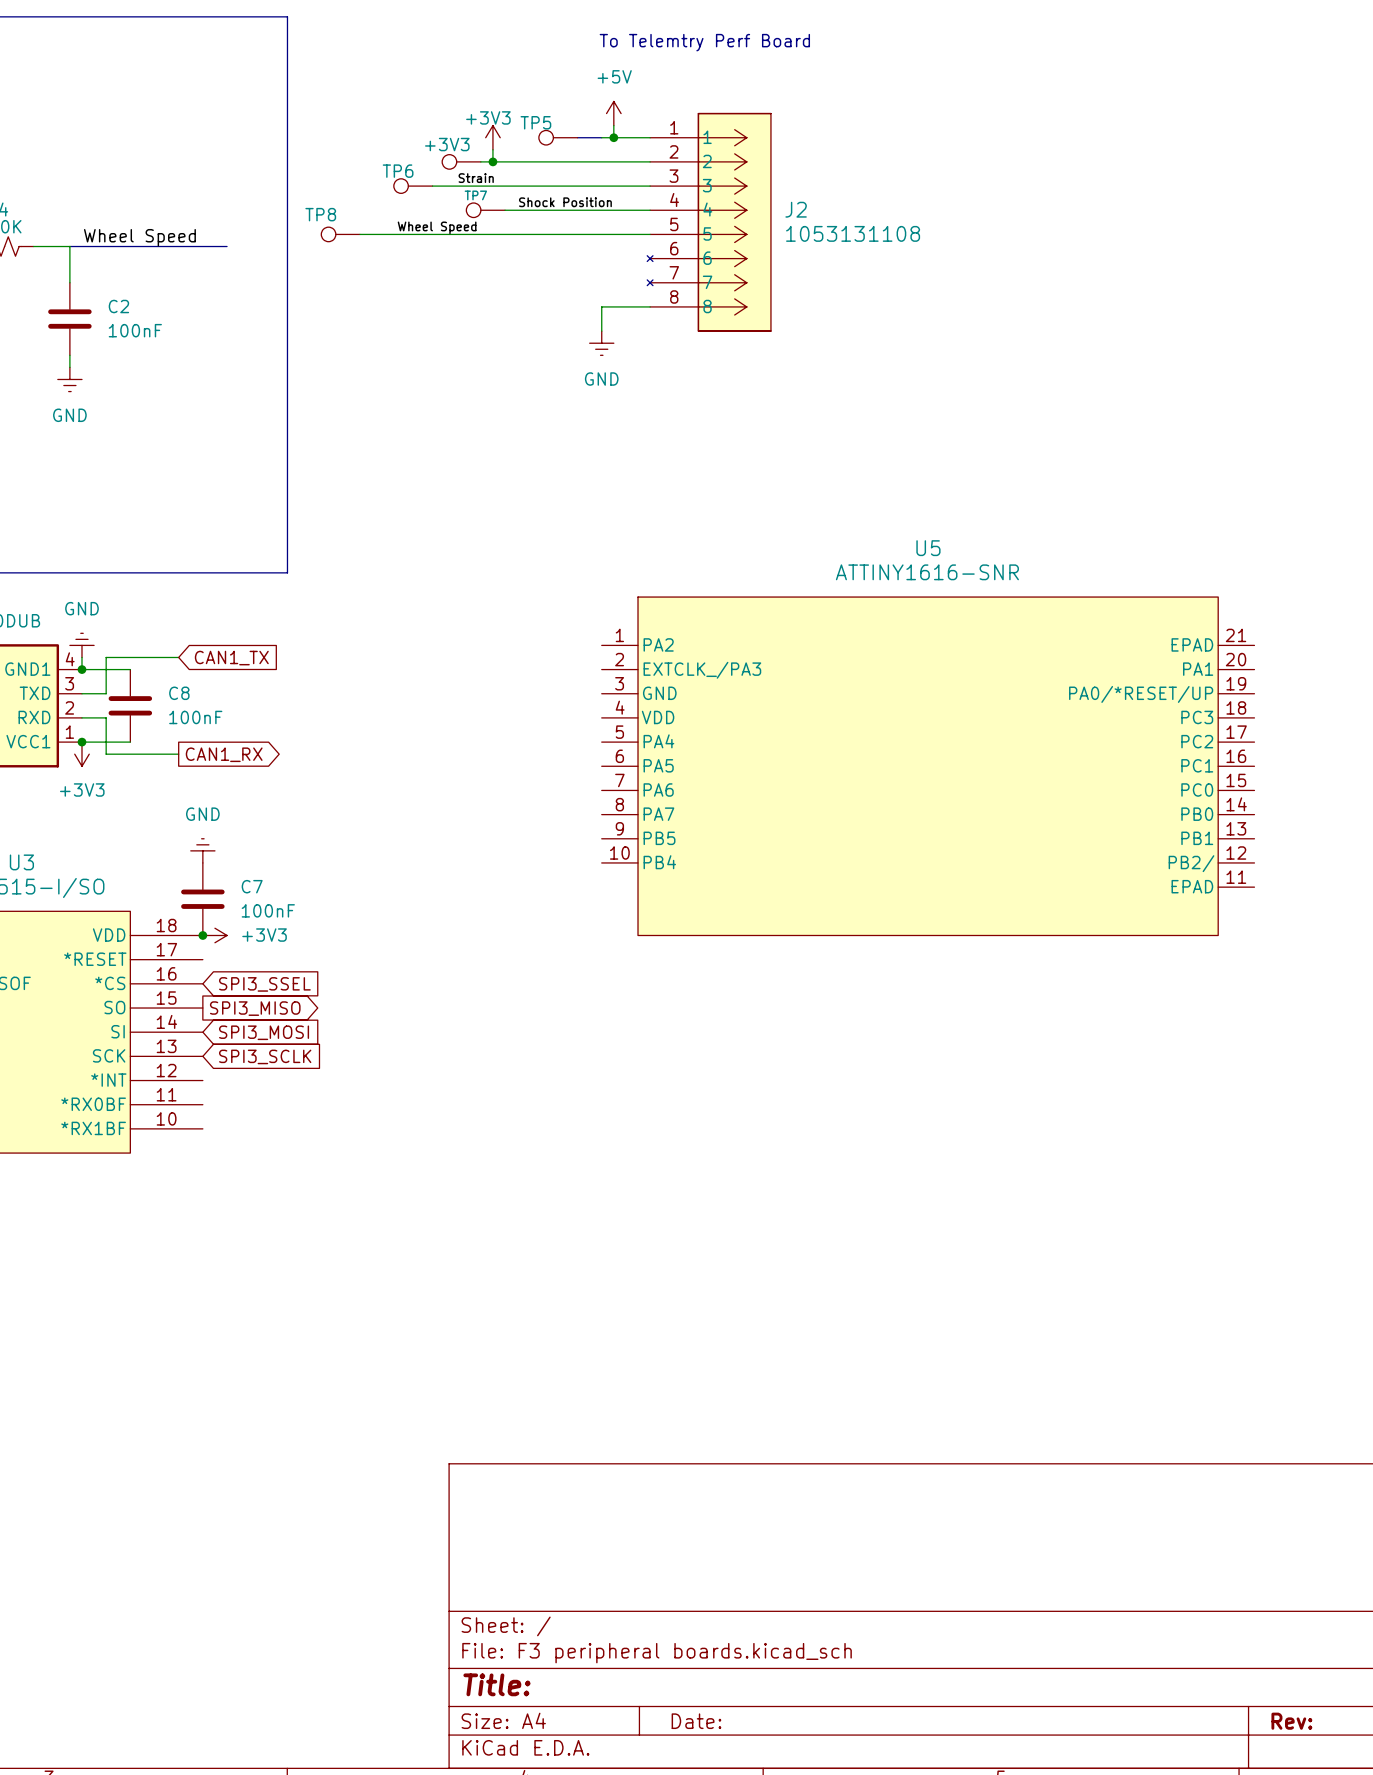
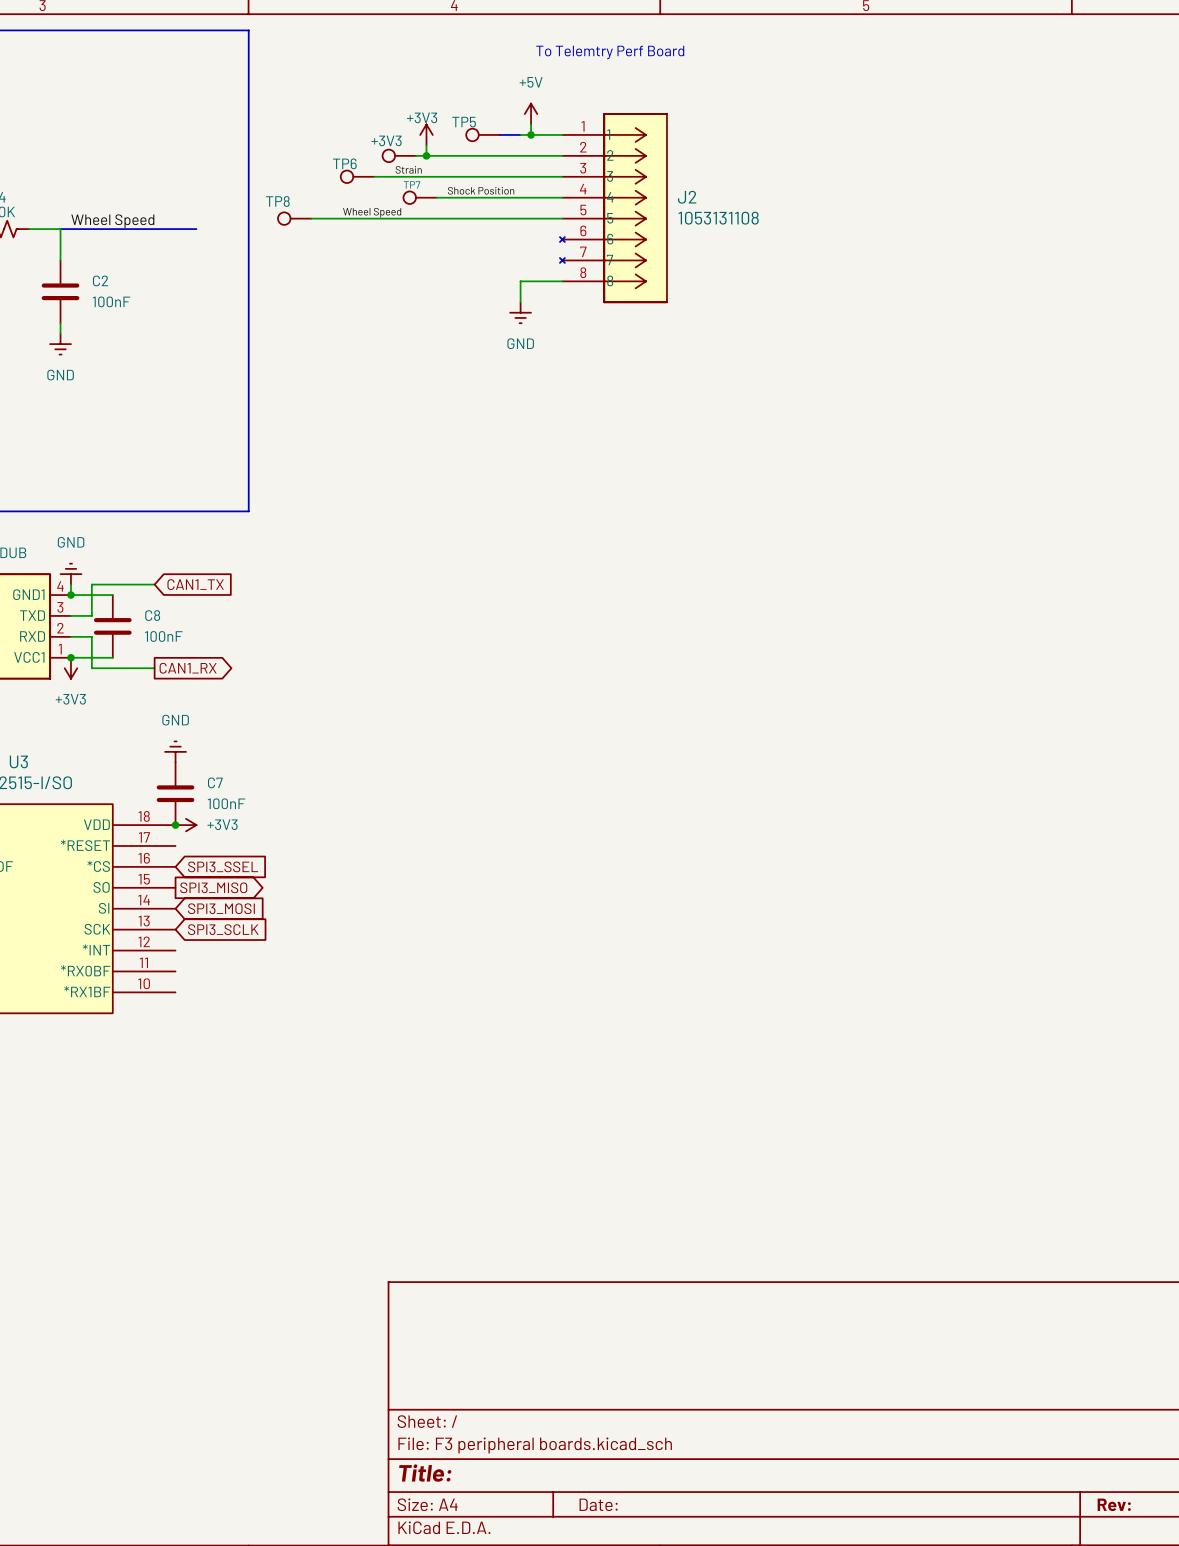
U5: ATTINY1616-SNR (928, 766) -> none

